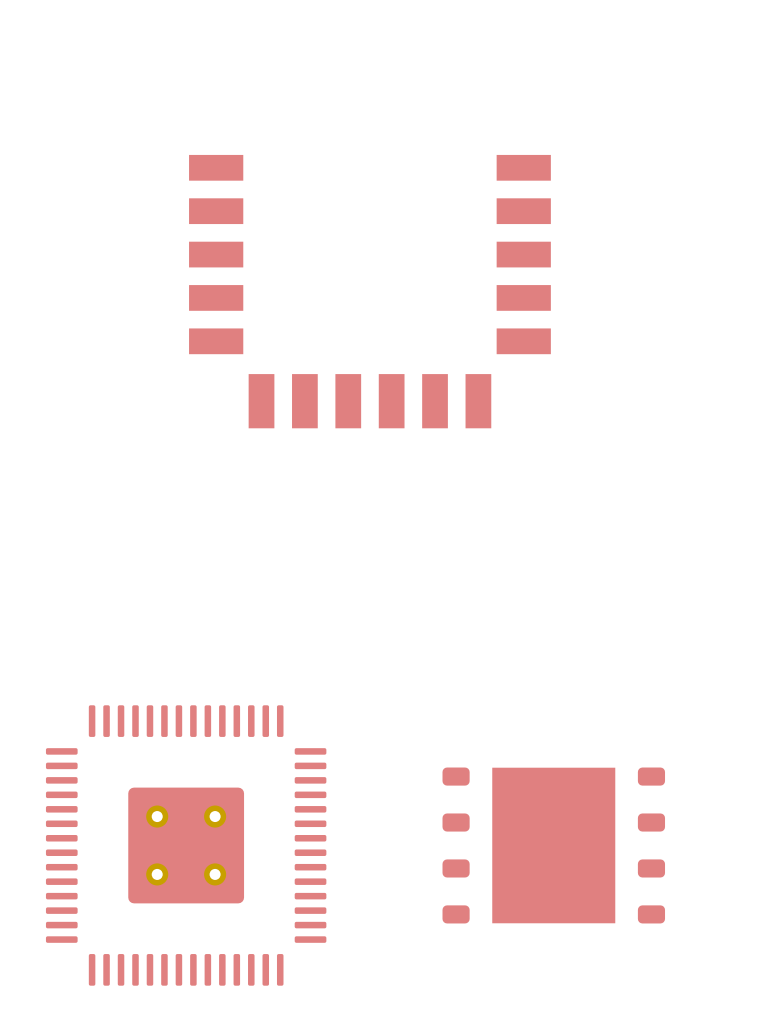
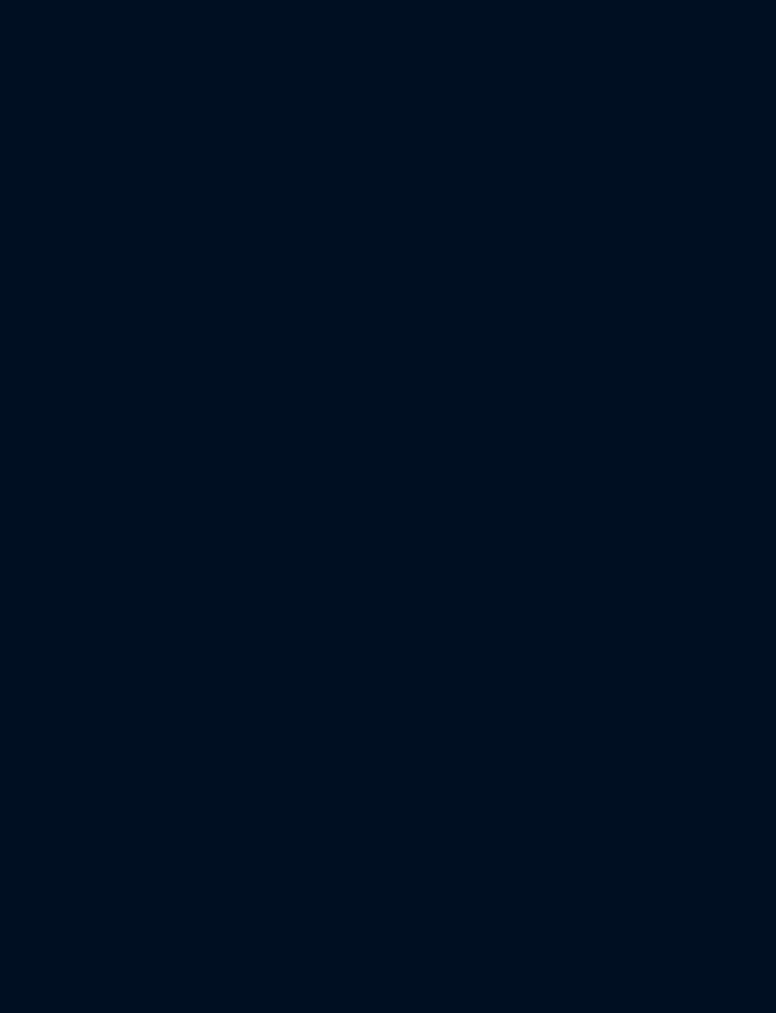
part: (369, 291) -> none
part: (186, 845) -> none
part: (553, 845) -> none

